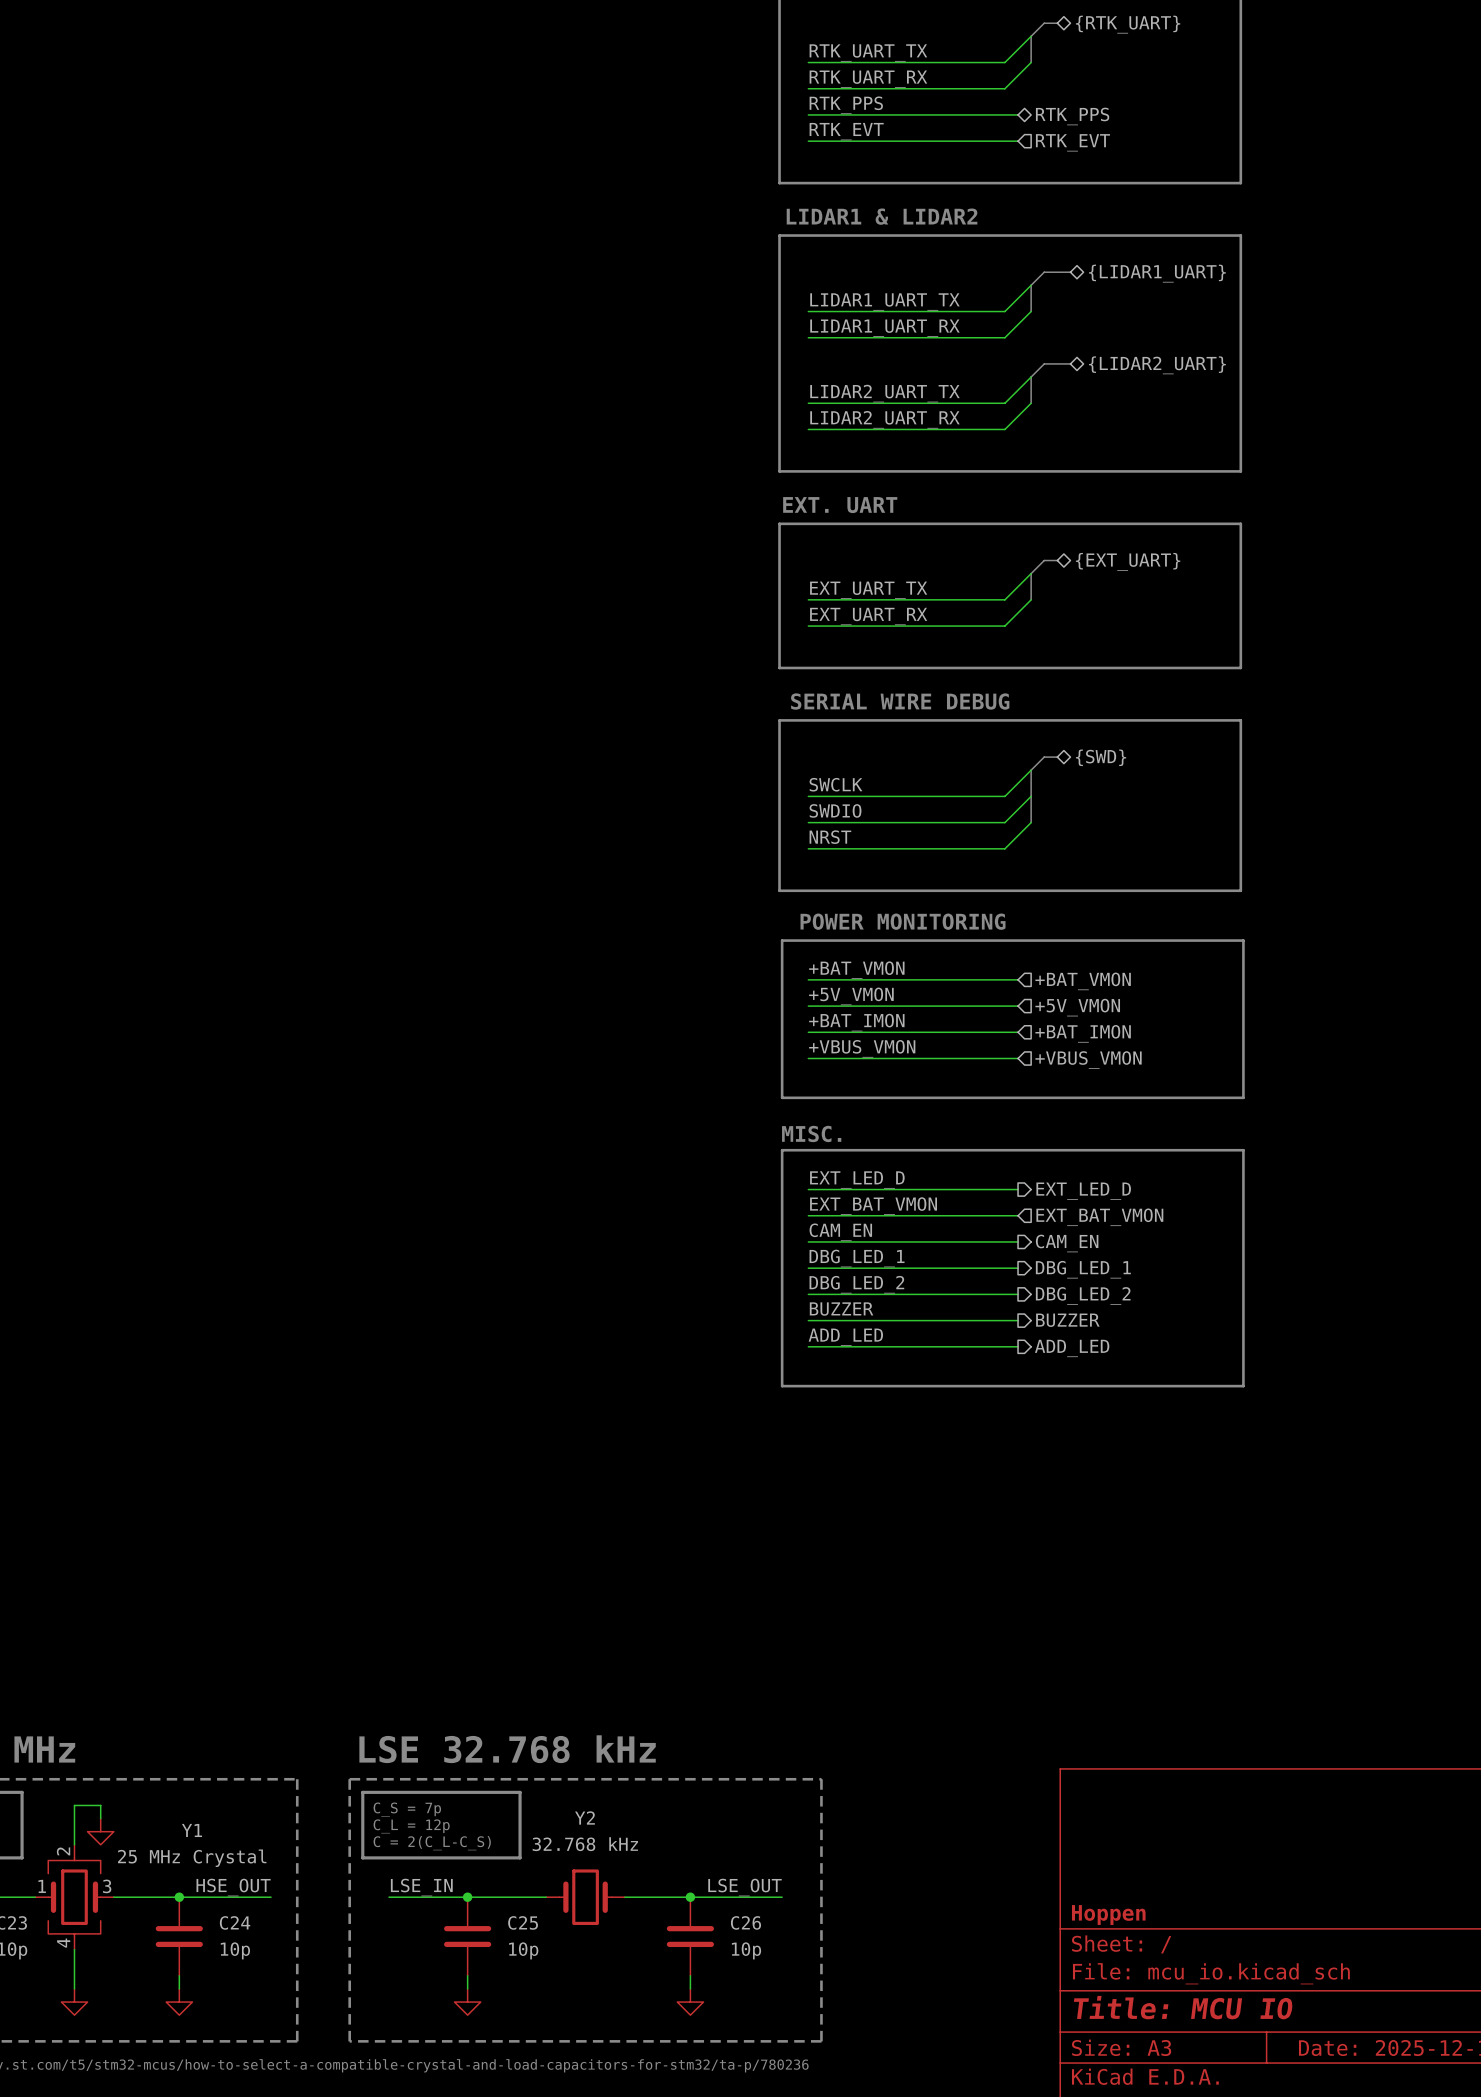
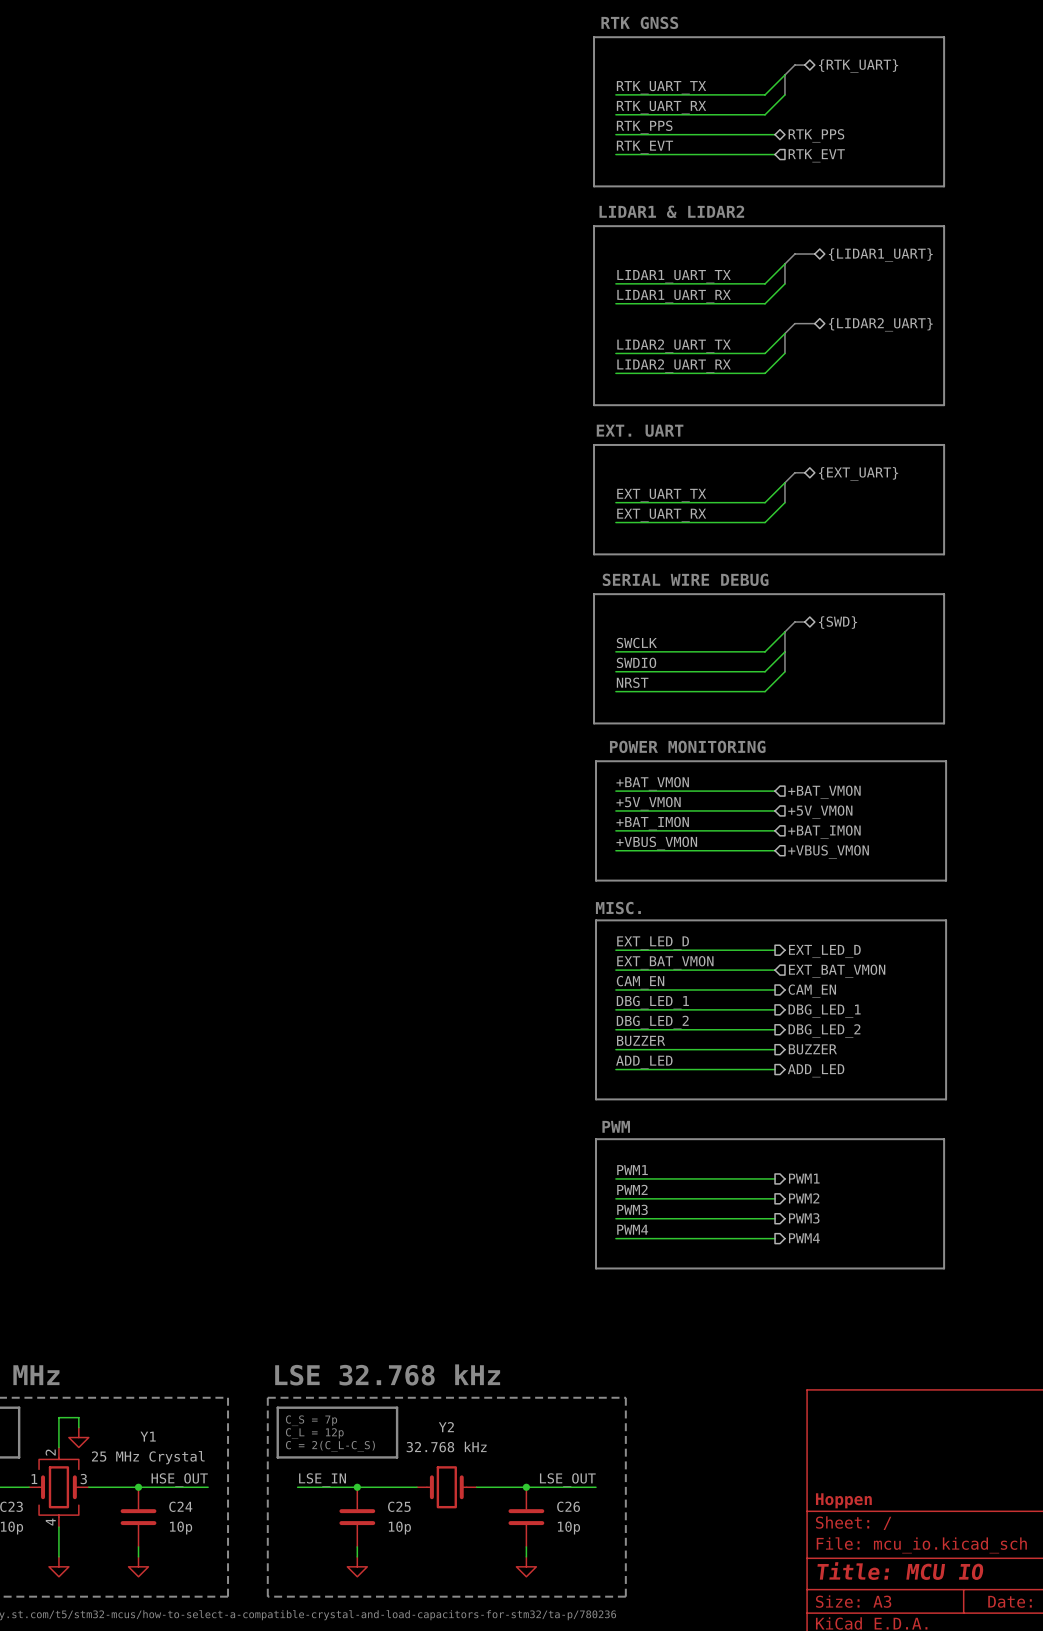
text: none -> PWM (616, 1126)
line: none -> (596, 1139) (944, 1139) (944, 1268) (596, 1268) (596, 1139)
label: none -> PWM1 (632, 1170)
wire: none -> (615, 1178) (775, 1178)
hierarchical label: none -> PWM1 (804, 1178)
label: none -> PWM2 (632, 1189)
hierarchical label: none -> PWM2 (804, 1198)
wire: none -> (615, 1198) (775, 1198)
label: none -> PWM3 (632, 1209)
hierarchical label: none -> PWM3 (804, 1218)
wire: none -> (615, 1218) (775, 1218)
label: none -> PWM4 (632, 1229)
wire: none -> (615, 1238) (775, 1238)
hierarchical label: none -> PWM4 (804, 1238)

